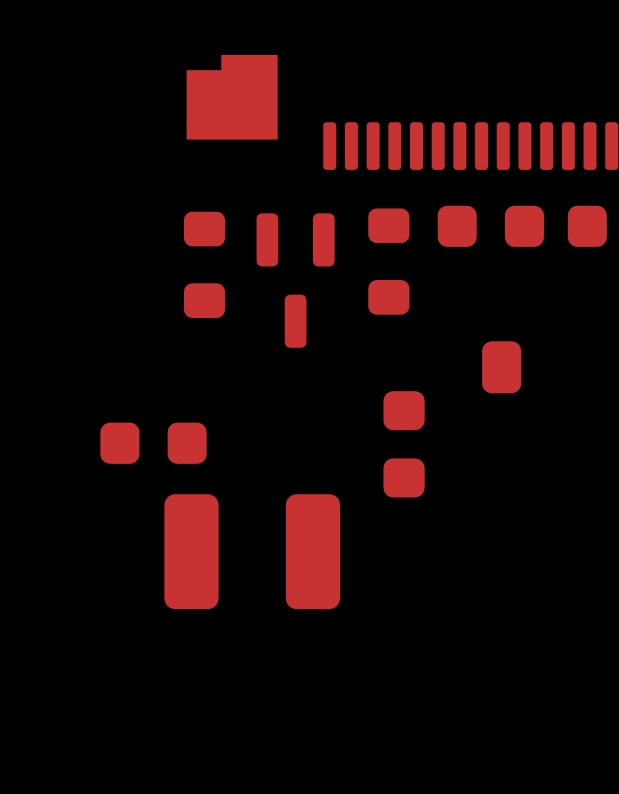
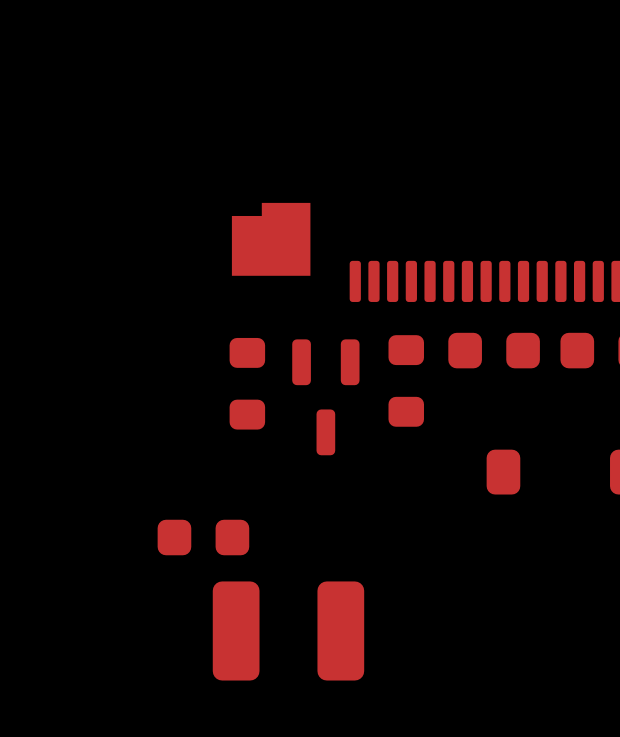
part: (404, 444) -> none

